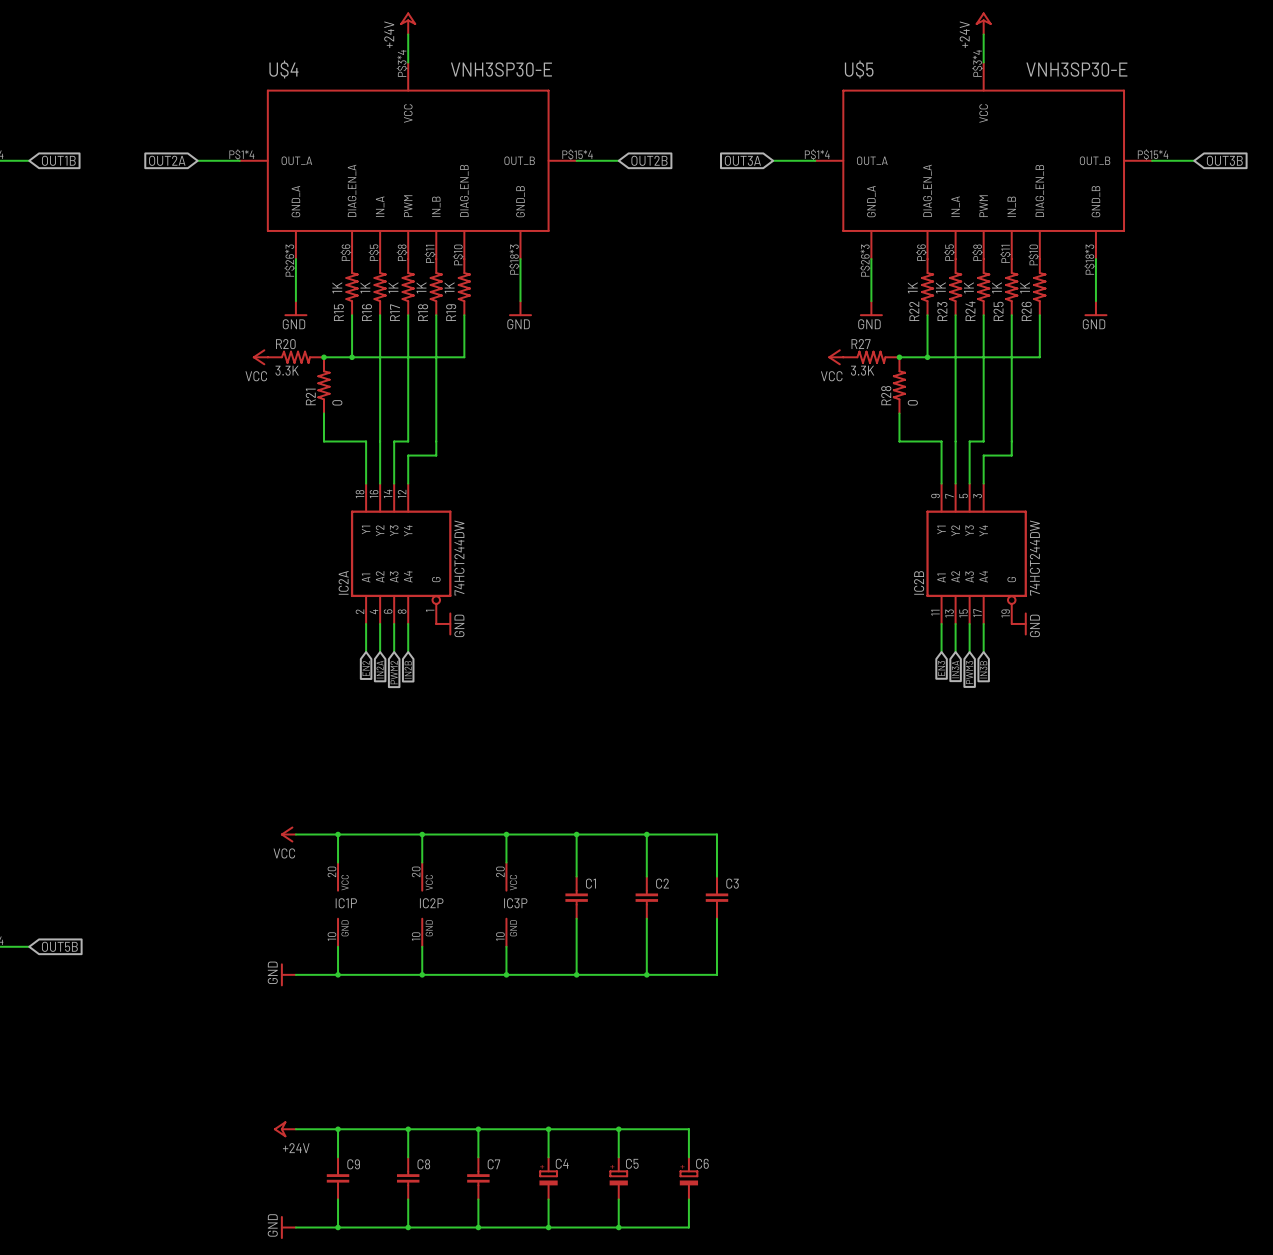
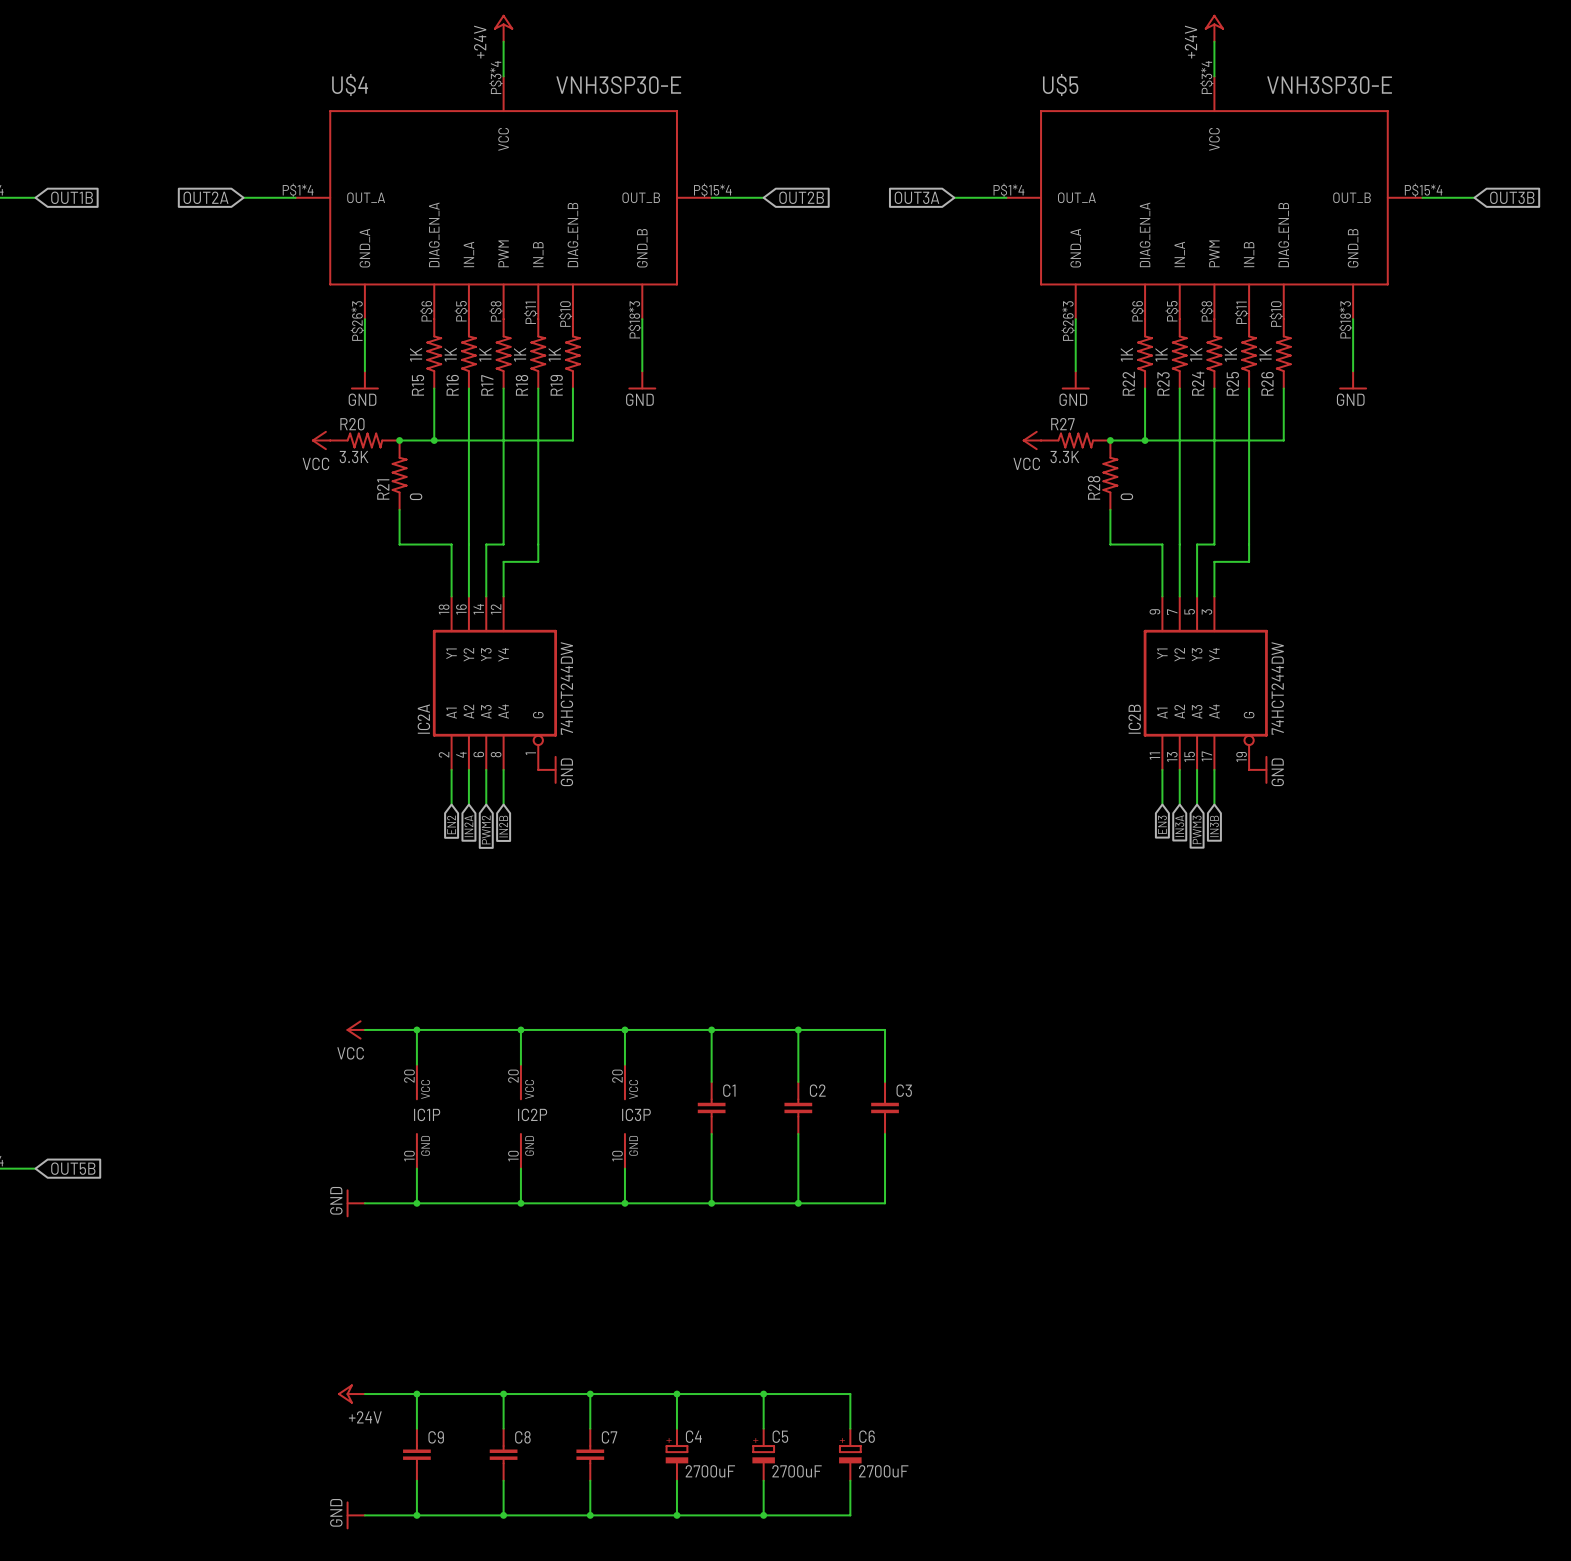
C4 value: none -> 2700uF (710, 1471)
C5 value: none -> 2700uF (797, 1471)
C6 value: none -> 2700uF (883, 1471)

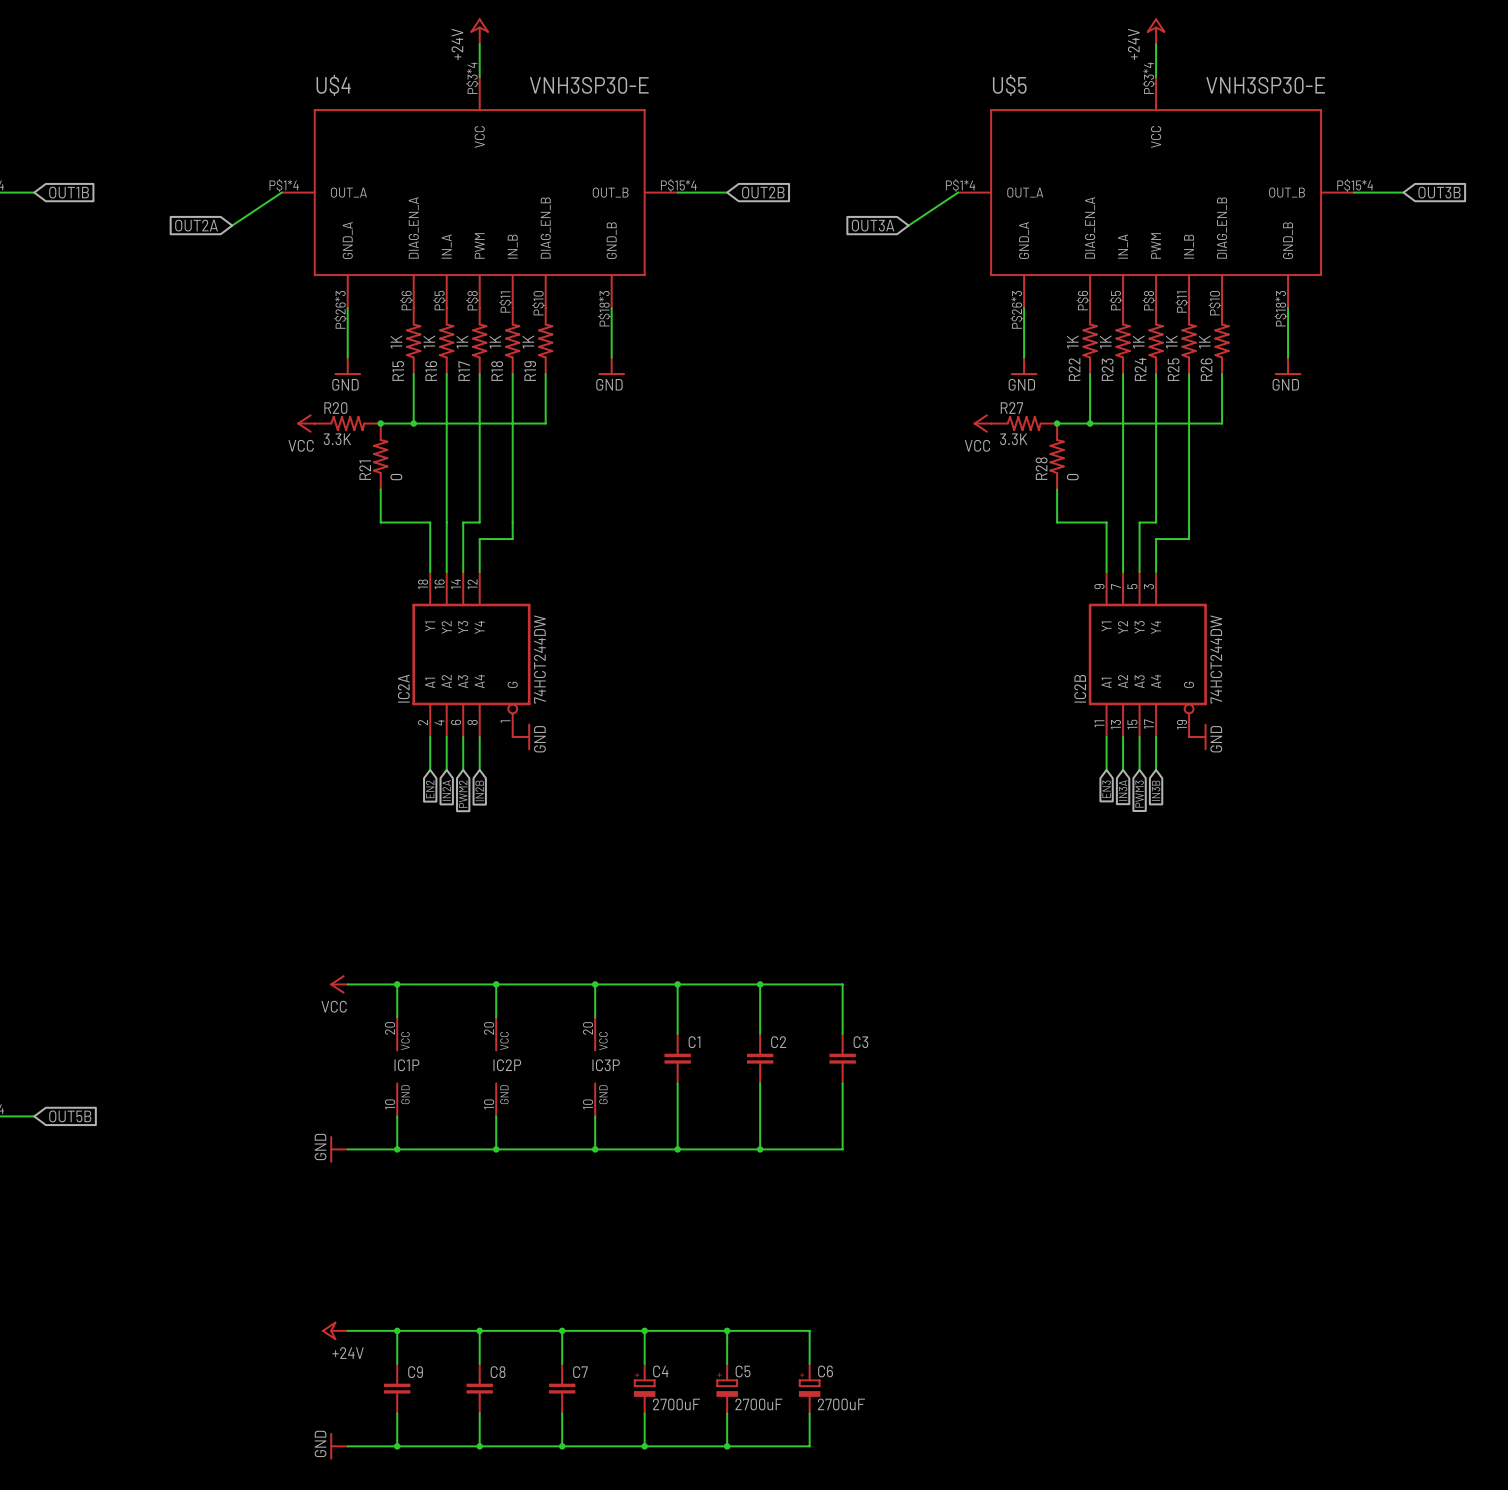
global label position: OUT2A (206, 197) -> OUT2A (196, 225)
wire: (243, 197) (295, 197) -> (232, 225) (281, 192)
global label position: OUT3A (916, 197) -> OUT3A (873, 225)
wire: (954, 197) (1006, 197) -> (908, 225) (958, 192)

